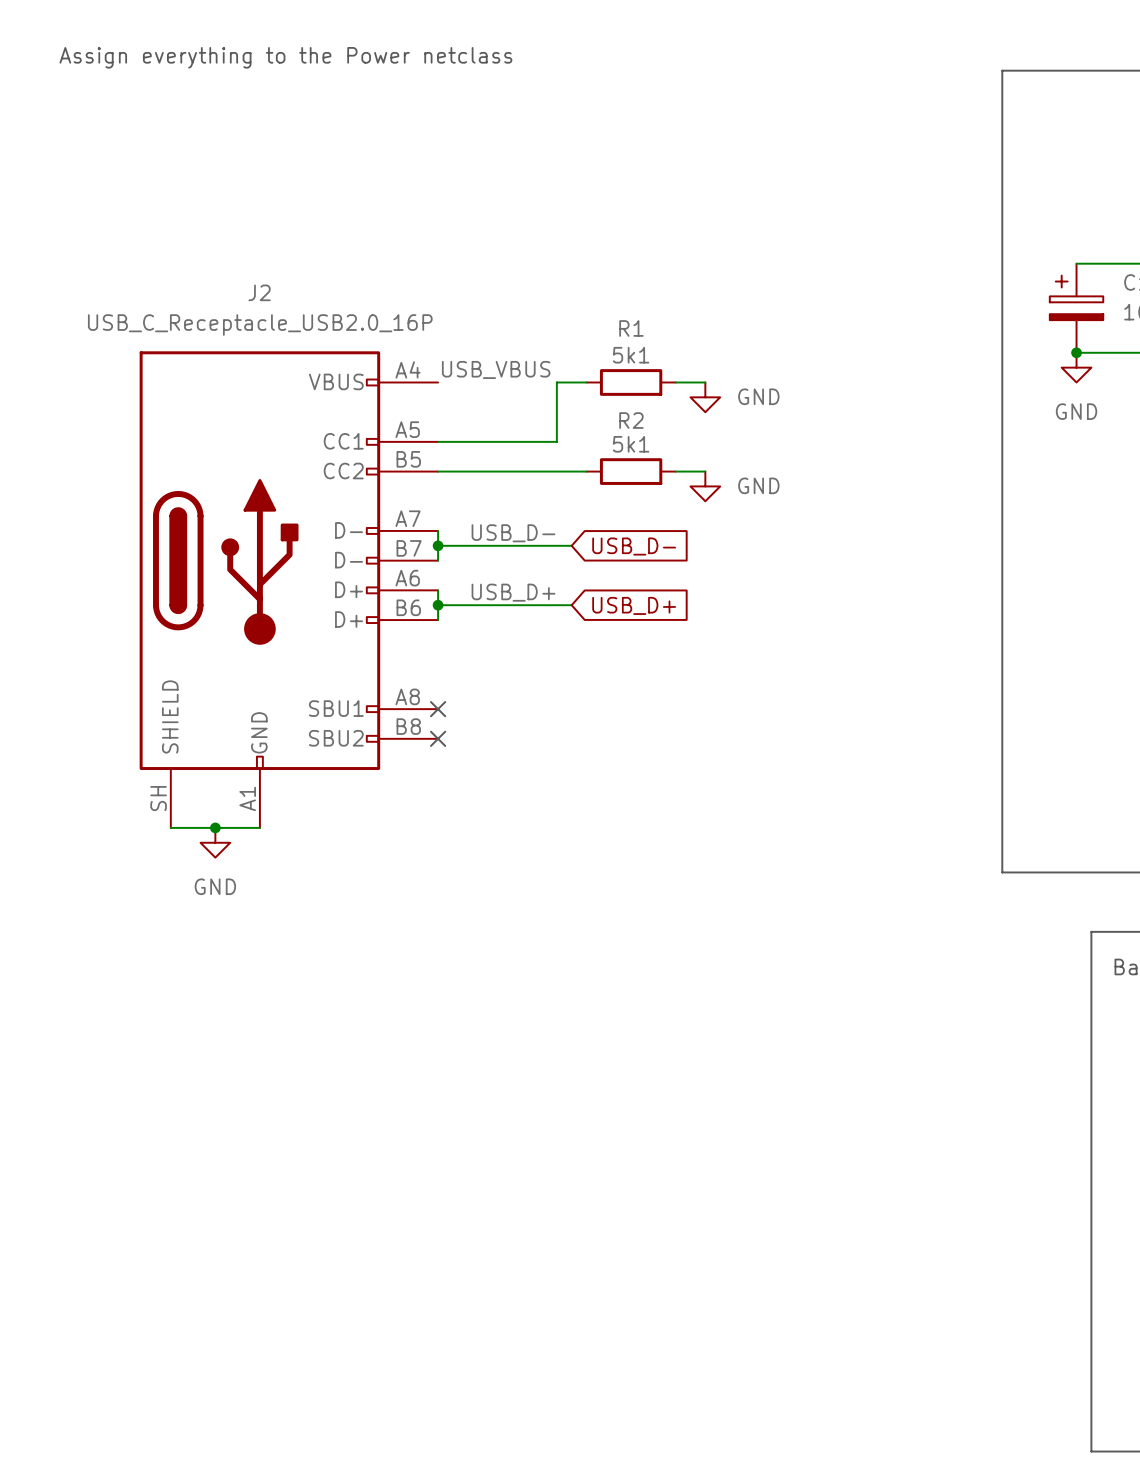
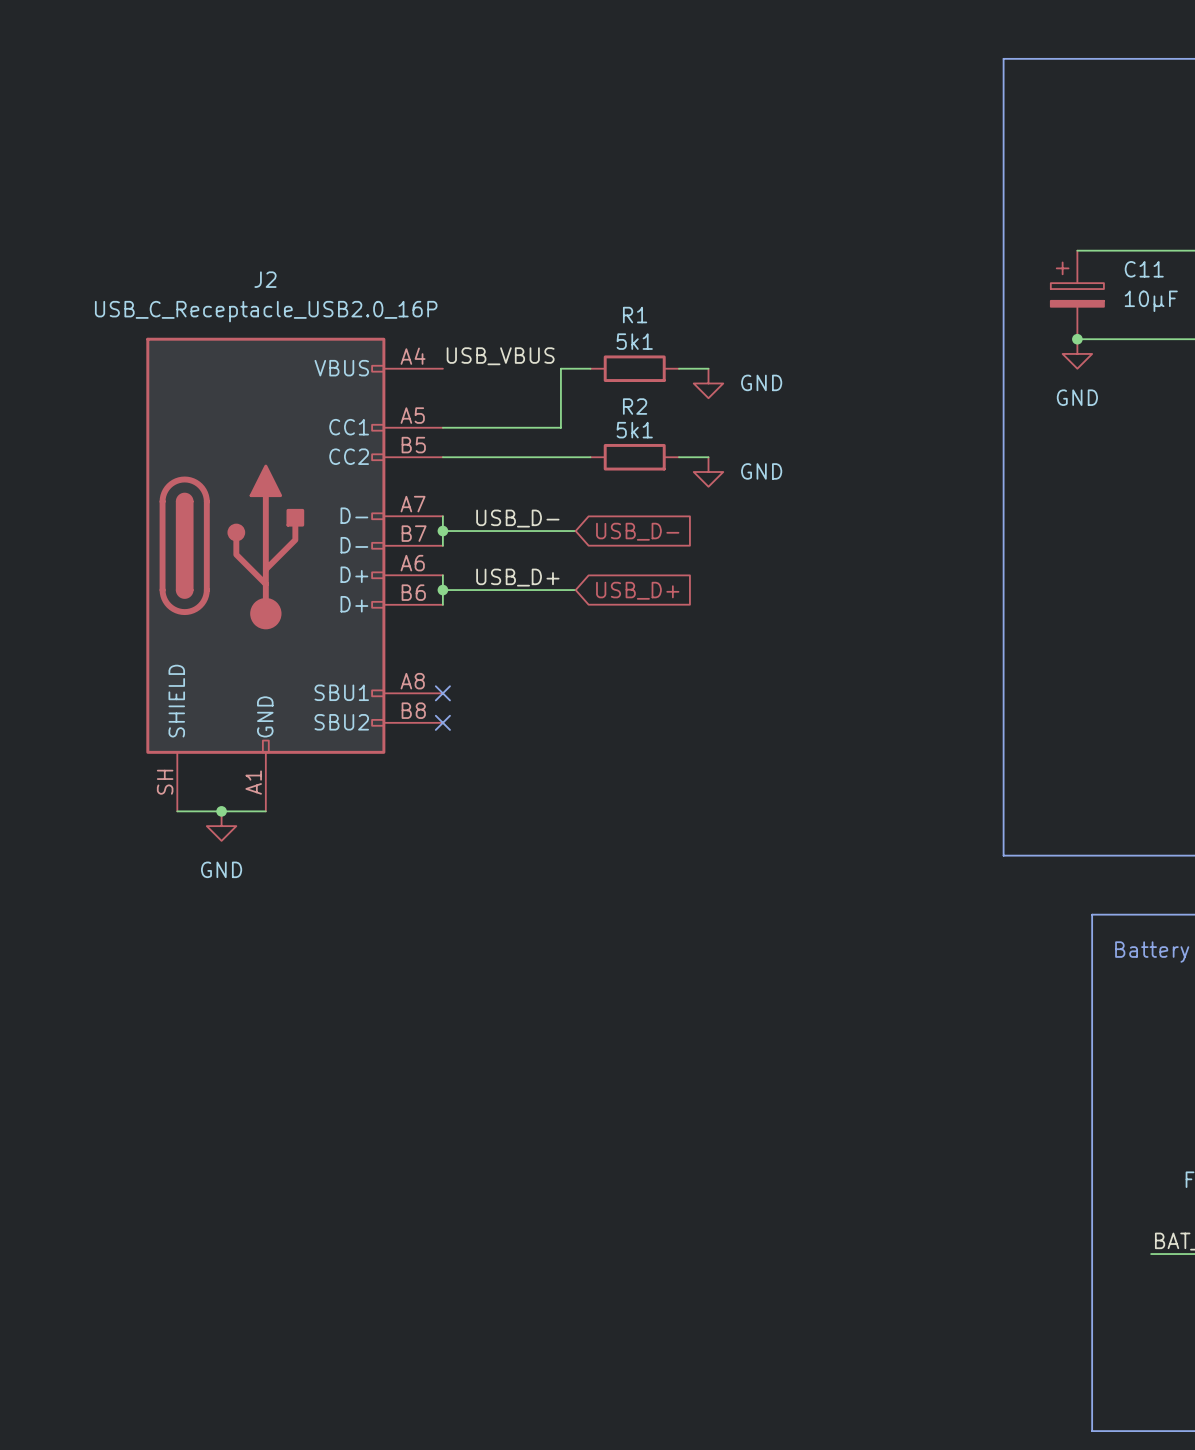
text: Assign everything to the Power netclass (285, 57) -> none

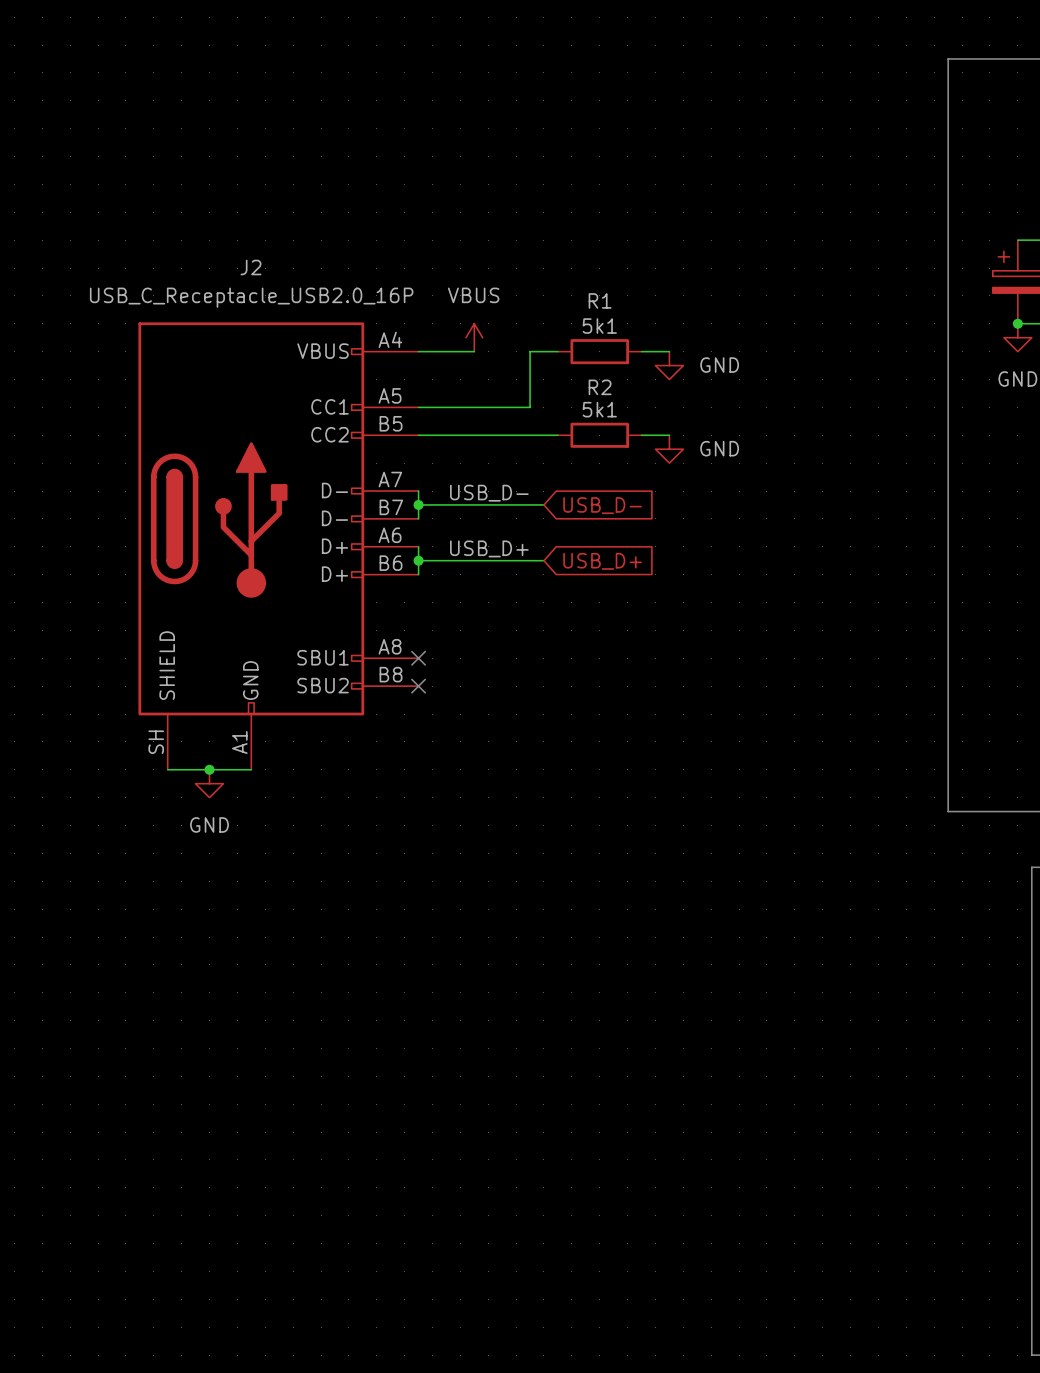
power symbol: none -> VBUS (474, 337)
label: USB_VBUS (500, 356) -> none
wire: none -> (418, 351) (474, 351)

